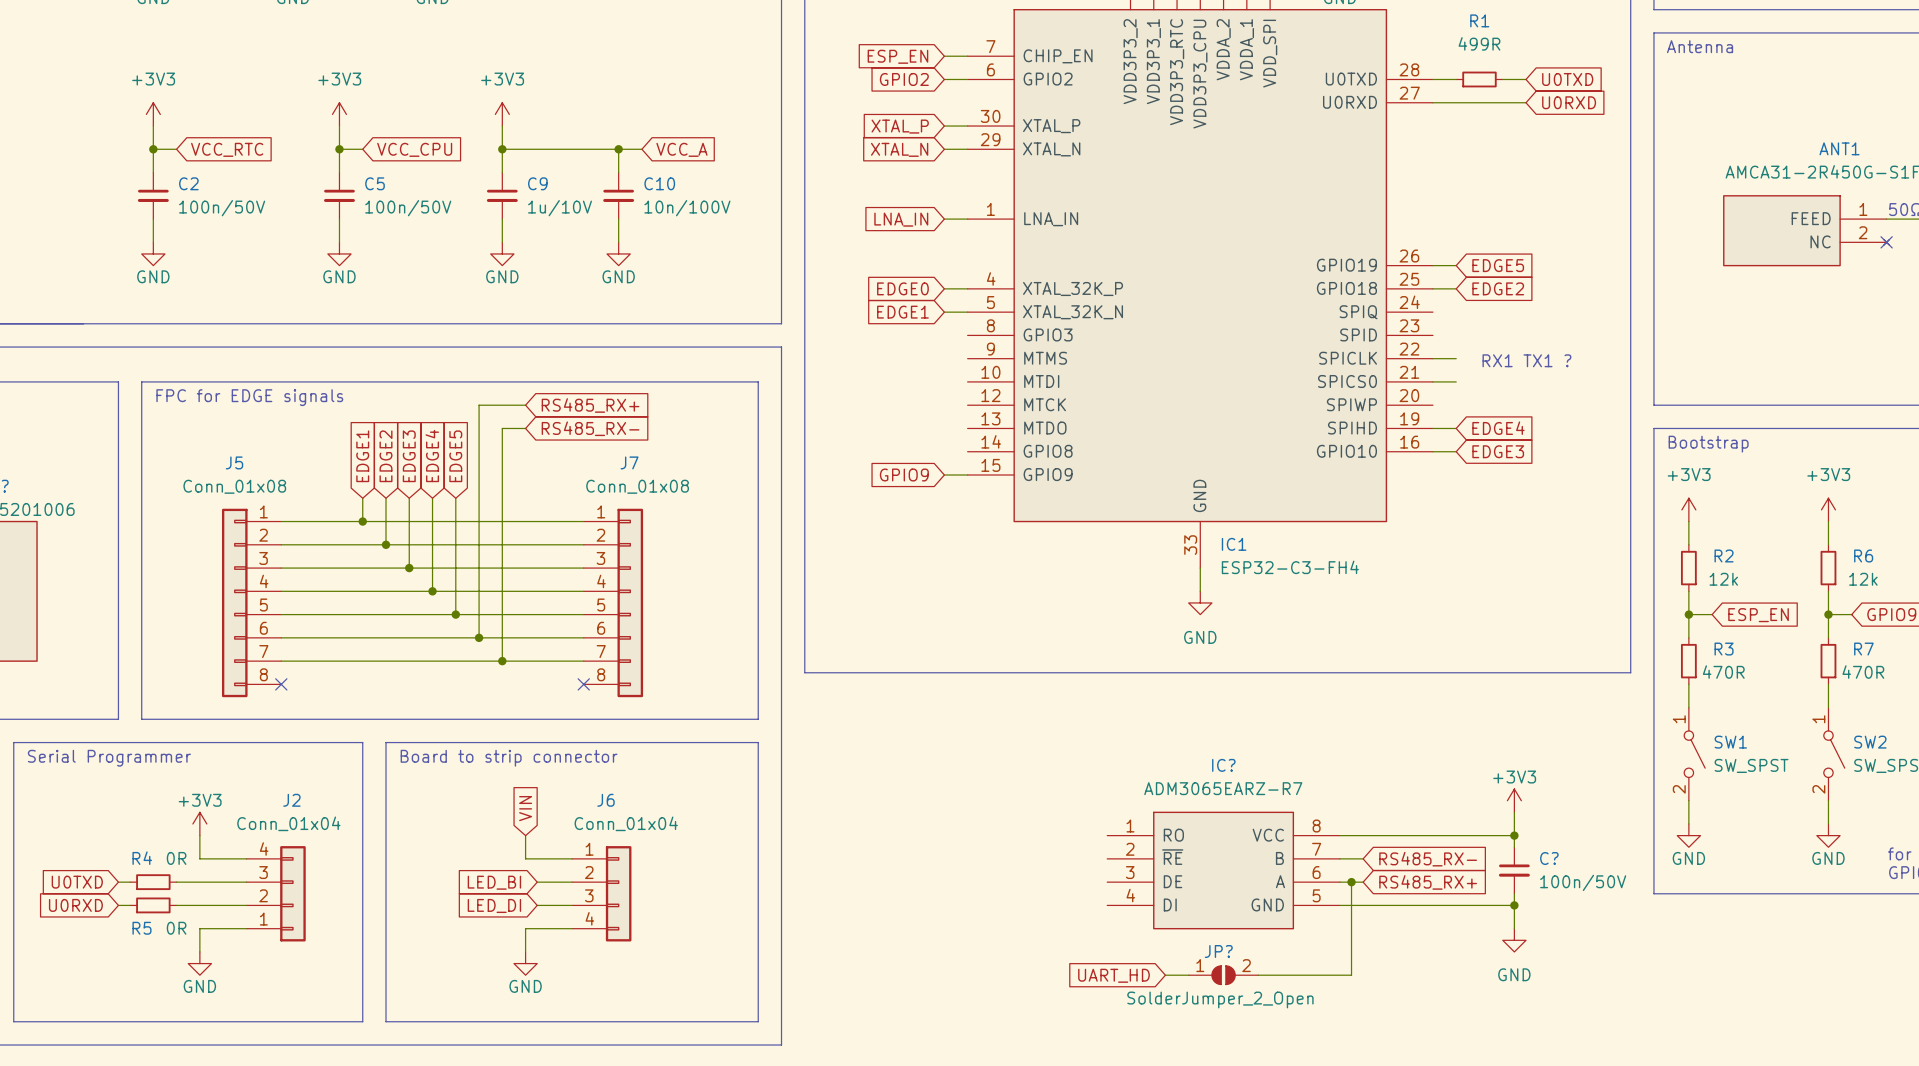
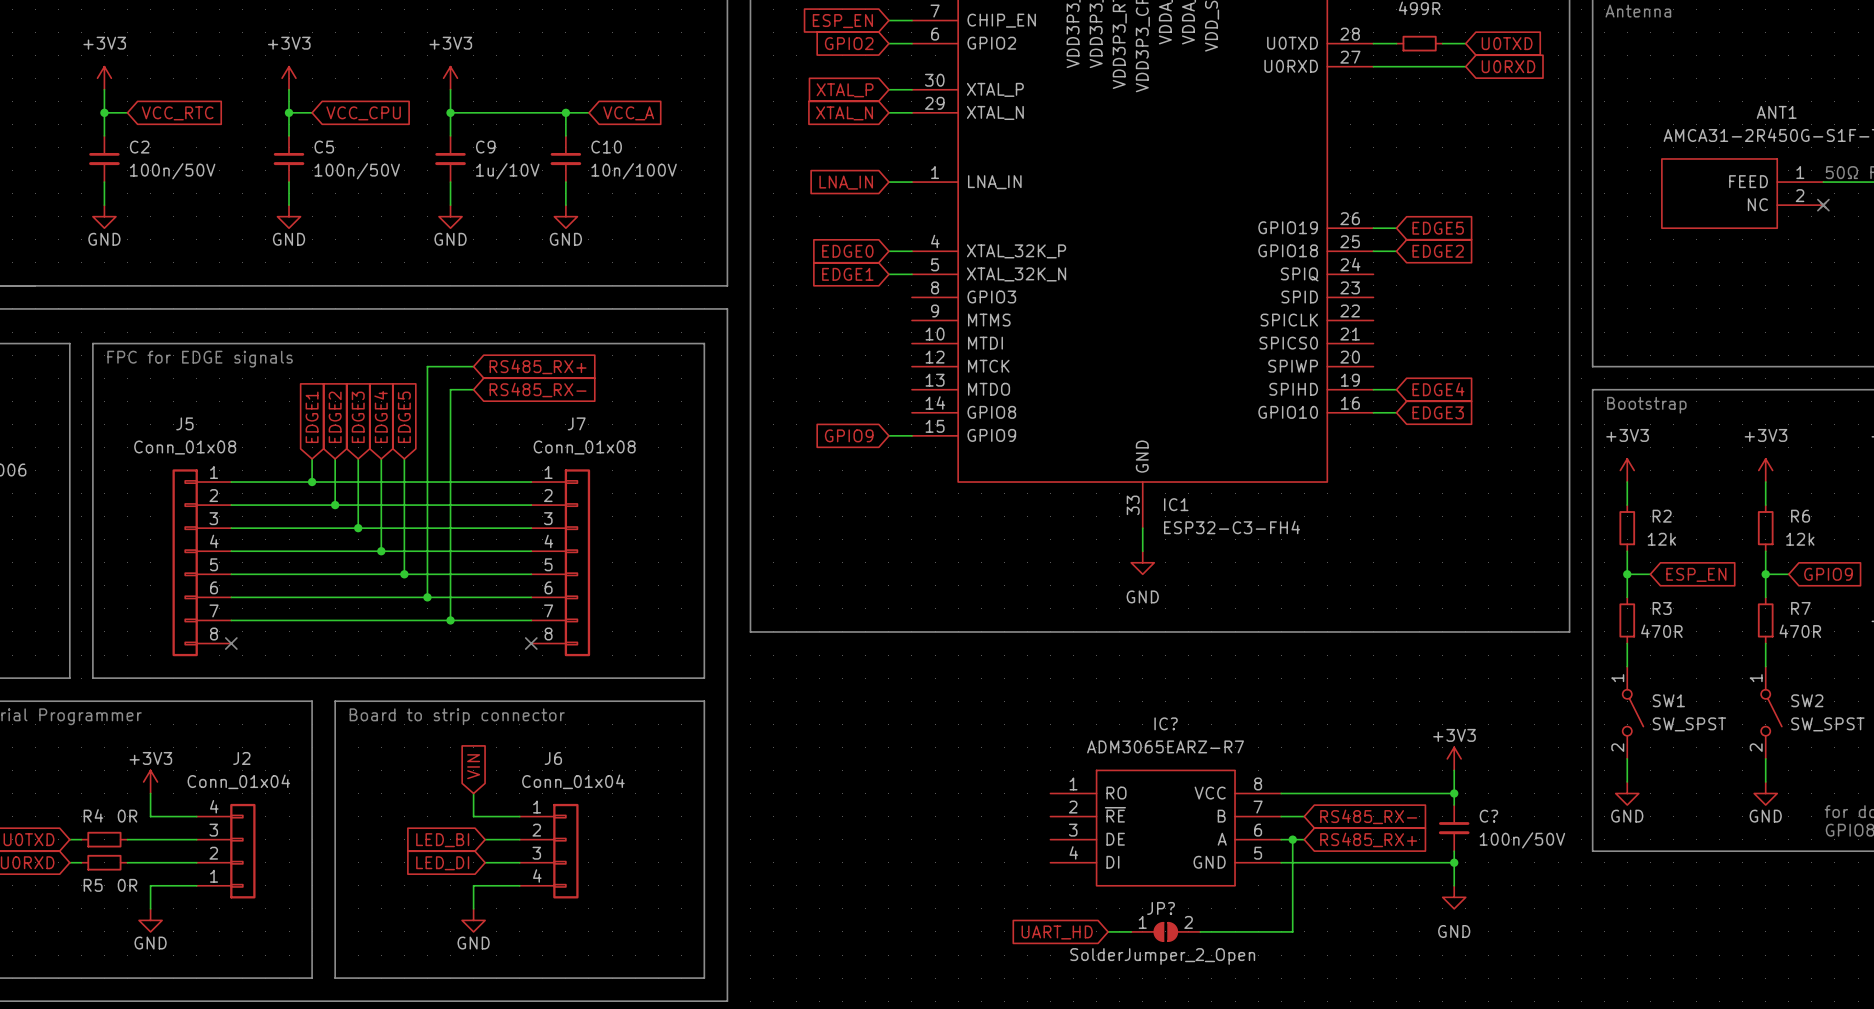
wire: (1432, 358) (1456, 358) -> none
text: RX1 TX1 ? (1526, 360) -> none
wire: (1432, 381) (1456, 381) -> none

